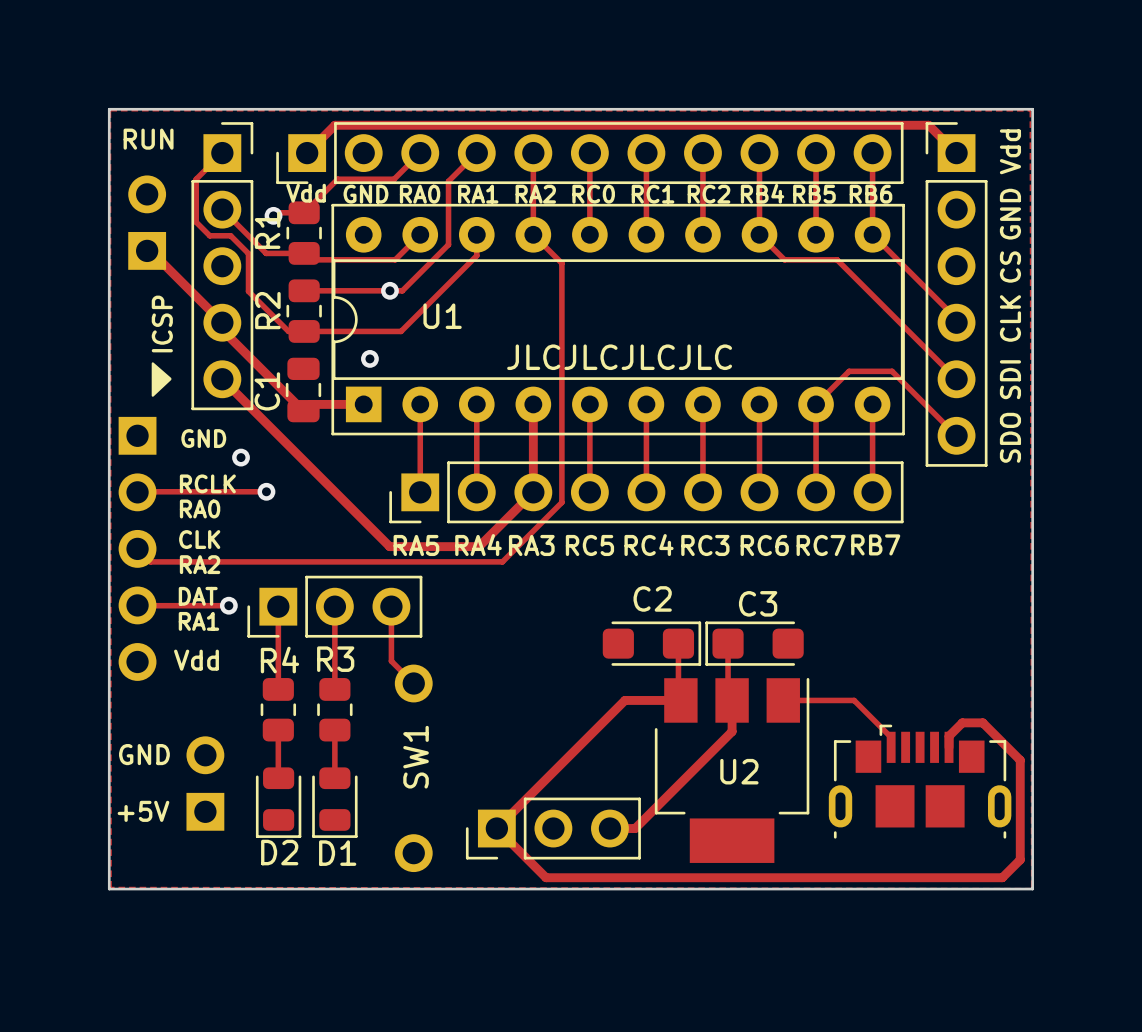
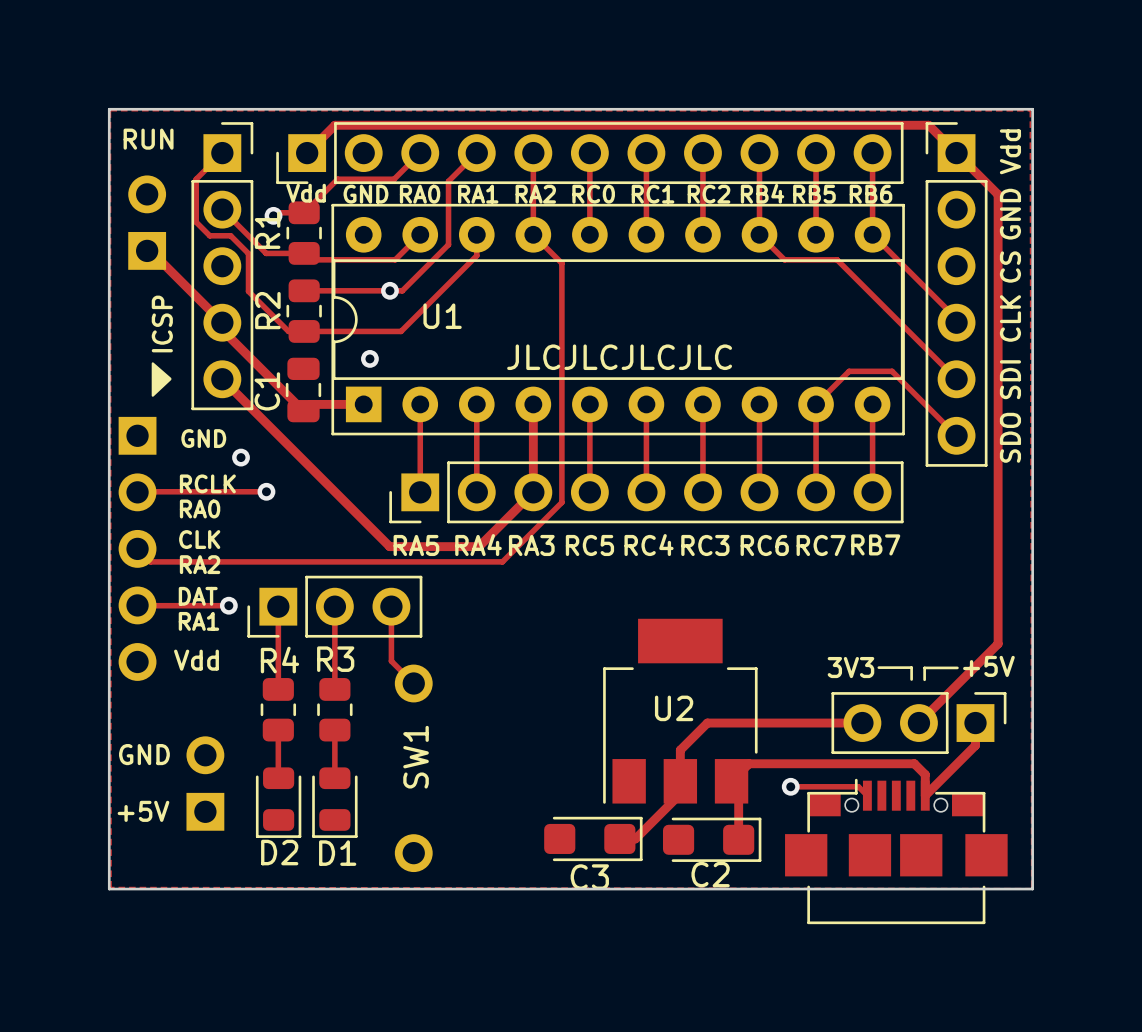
track: none -> (956, 153) (998, 194) (998, 643) (918, 723)
C2 name position: C2 (652, 598) -> C2 (710, 874)
C2 position: (651, 643) -> (712, 839)
track: (678, 643) (678, 698) (680, 700) (624, 700) (496, 828) (546, 877) (1002, 877) (1020, 859) (1020, 760) (982, 722) (962, 722) (949, 736) (949, 747) -> none
track: (728, 643) (728, 696) (732, 700) (732, 731) (635, 828) (609, 828) -> none
C3 rotation: 0° (754, 643) -> 180° (593, 838)
C3 position: (754, 643) -> (593, 838)
text: none -> +5V (988, 666)
text: none -> 3V3 (850, 667)
line: none -> (878, 667) (911, 667) (911, 679)
line: none -> (957, 667) (924, 667) (924, 679)
track: (783, 700) (854, 700) (891, 737) (891, 747) -> none
track: none -> (862, 723) (707, 723) (680, 750) (680, 794) (635, 838) (619, 838)
track: none -> (975, 723) (975, 745) (925, 795) (925, 774) (914, 763) (749, 763) (731, 781) (738, 788) (738, 839)
U2 rotation: 0° (732, 770) -> 180° (680, 711)
part: (920, 781) -> none
track: none -> (790, 786) (858, 786) (867, 795)
via: none -> (790, 786)
part rotation: 0° (553, 828) -> 180° (918, 723)
part position: (553, 828) -> (918, 723)
part: none -> (896, 851)

